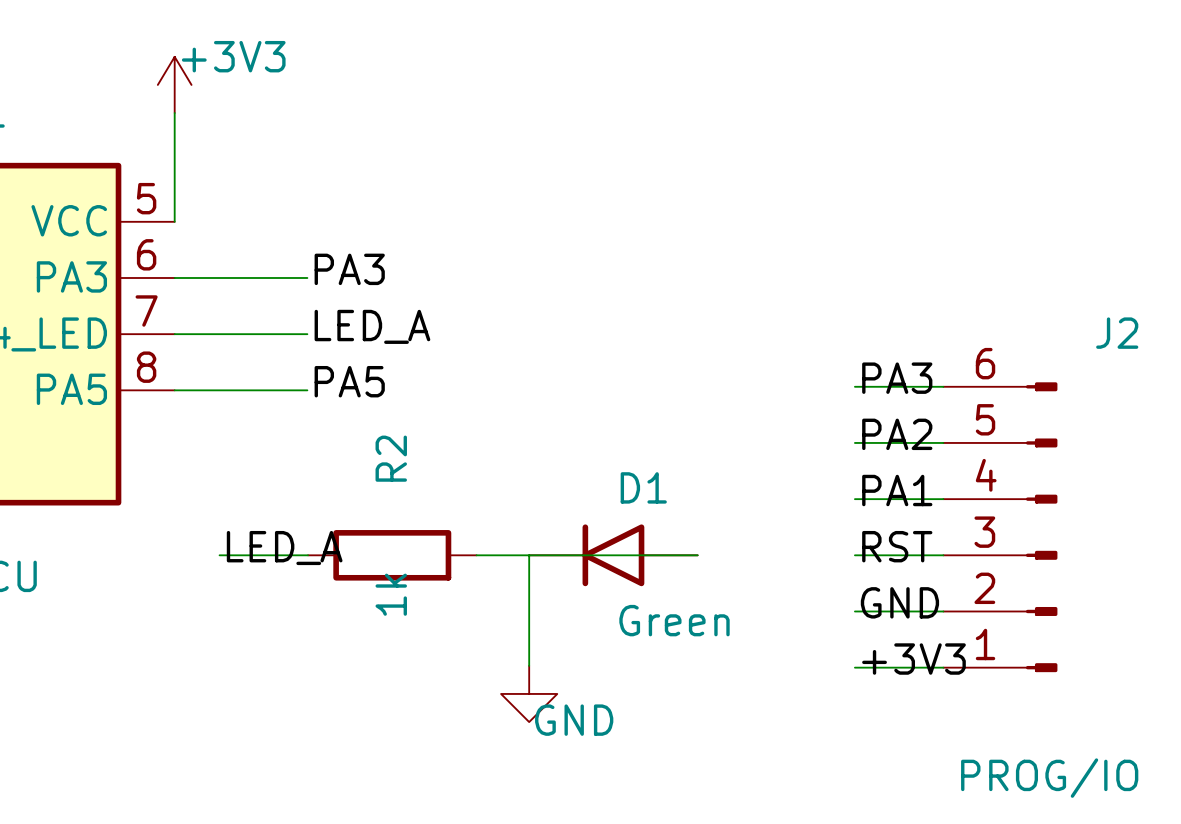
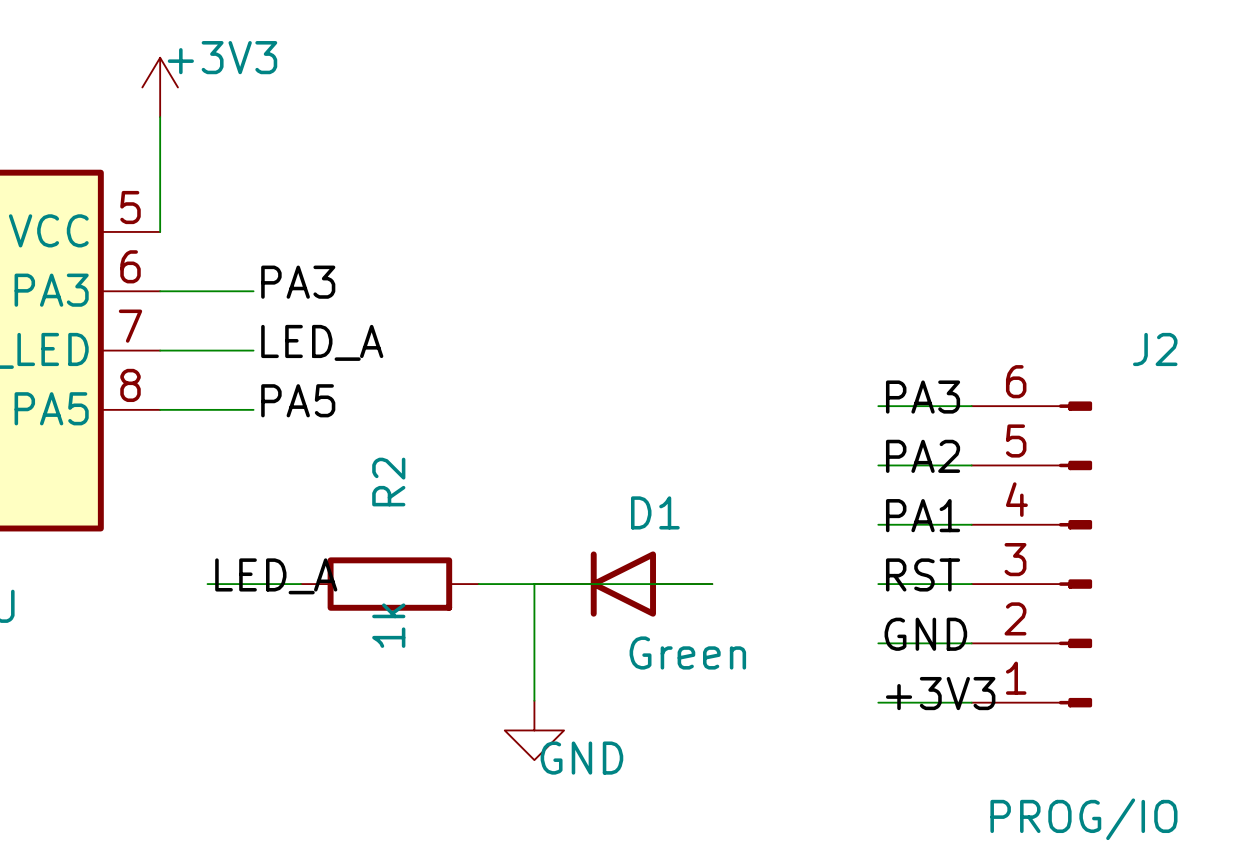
label position: PA3 (349, 269) -> PA3 (298, 282)
wire: (263, 277) (307, 277) -> none
label position: LED_A (372, 326) -> LED_A (322, 342)
wire: (263, 334) (307, 334) -> none
label position: PA5 (349, 381) -> PA5 (298, 400)
wire: (263, 390) (307, 390) -> none

